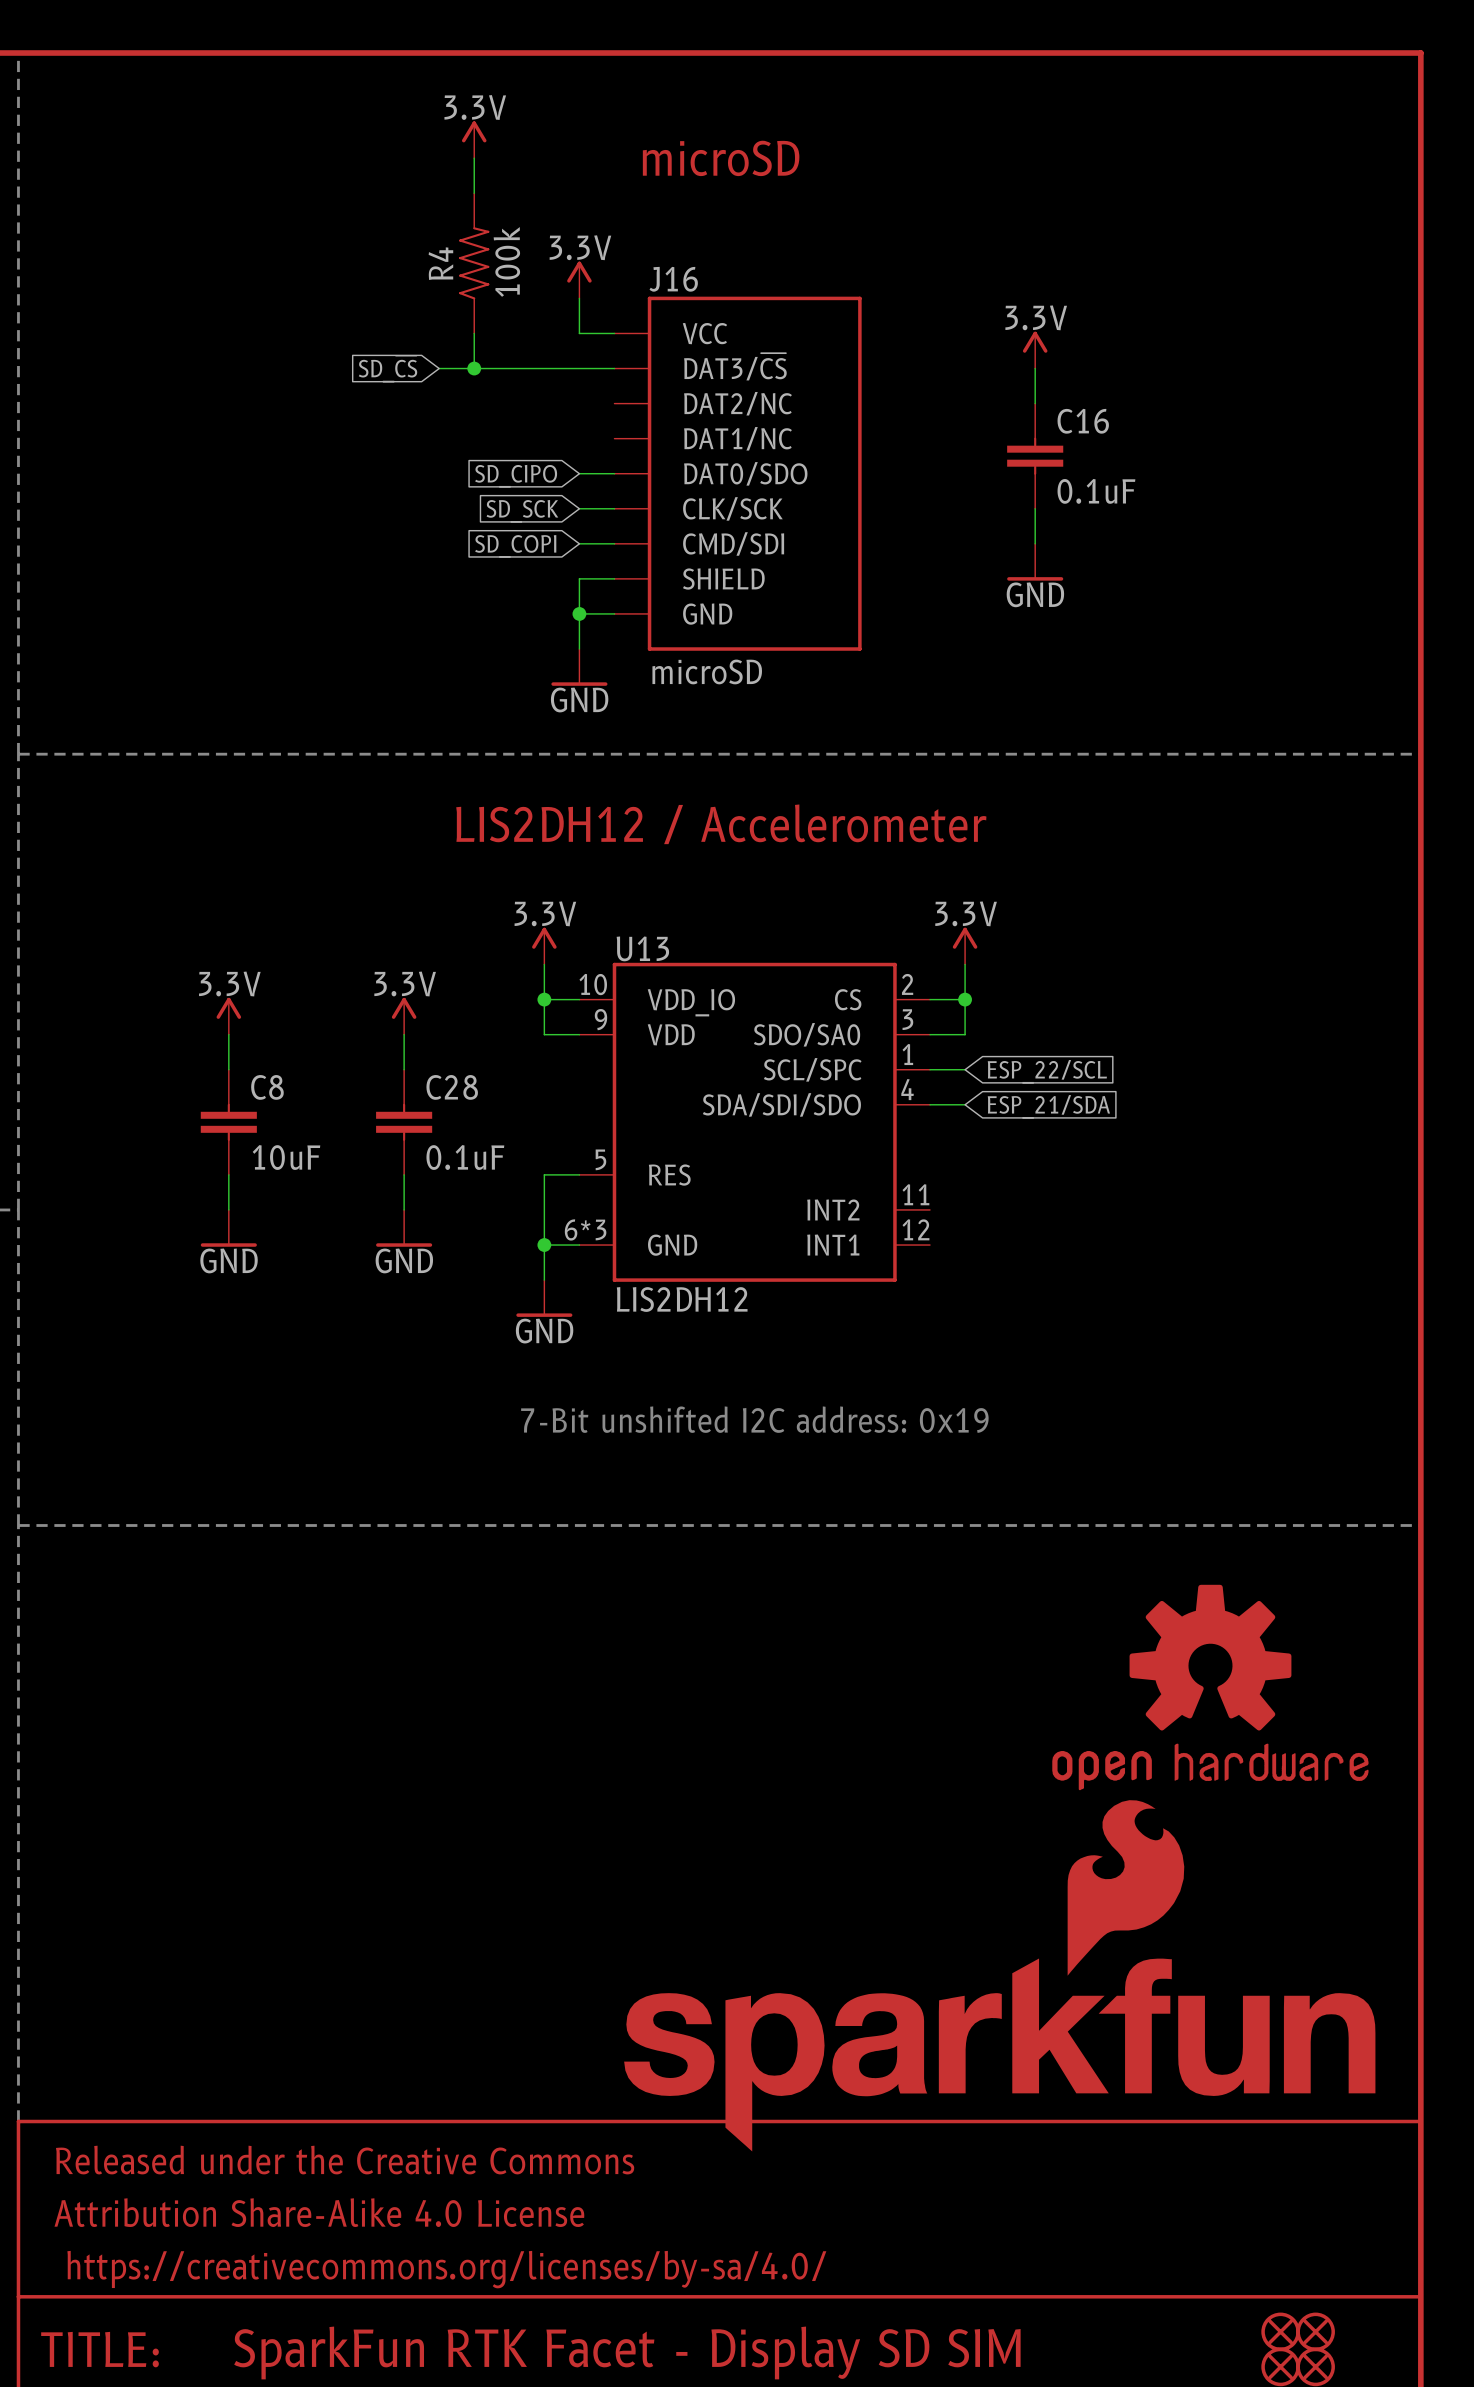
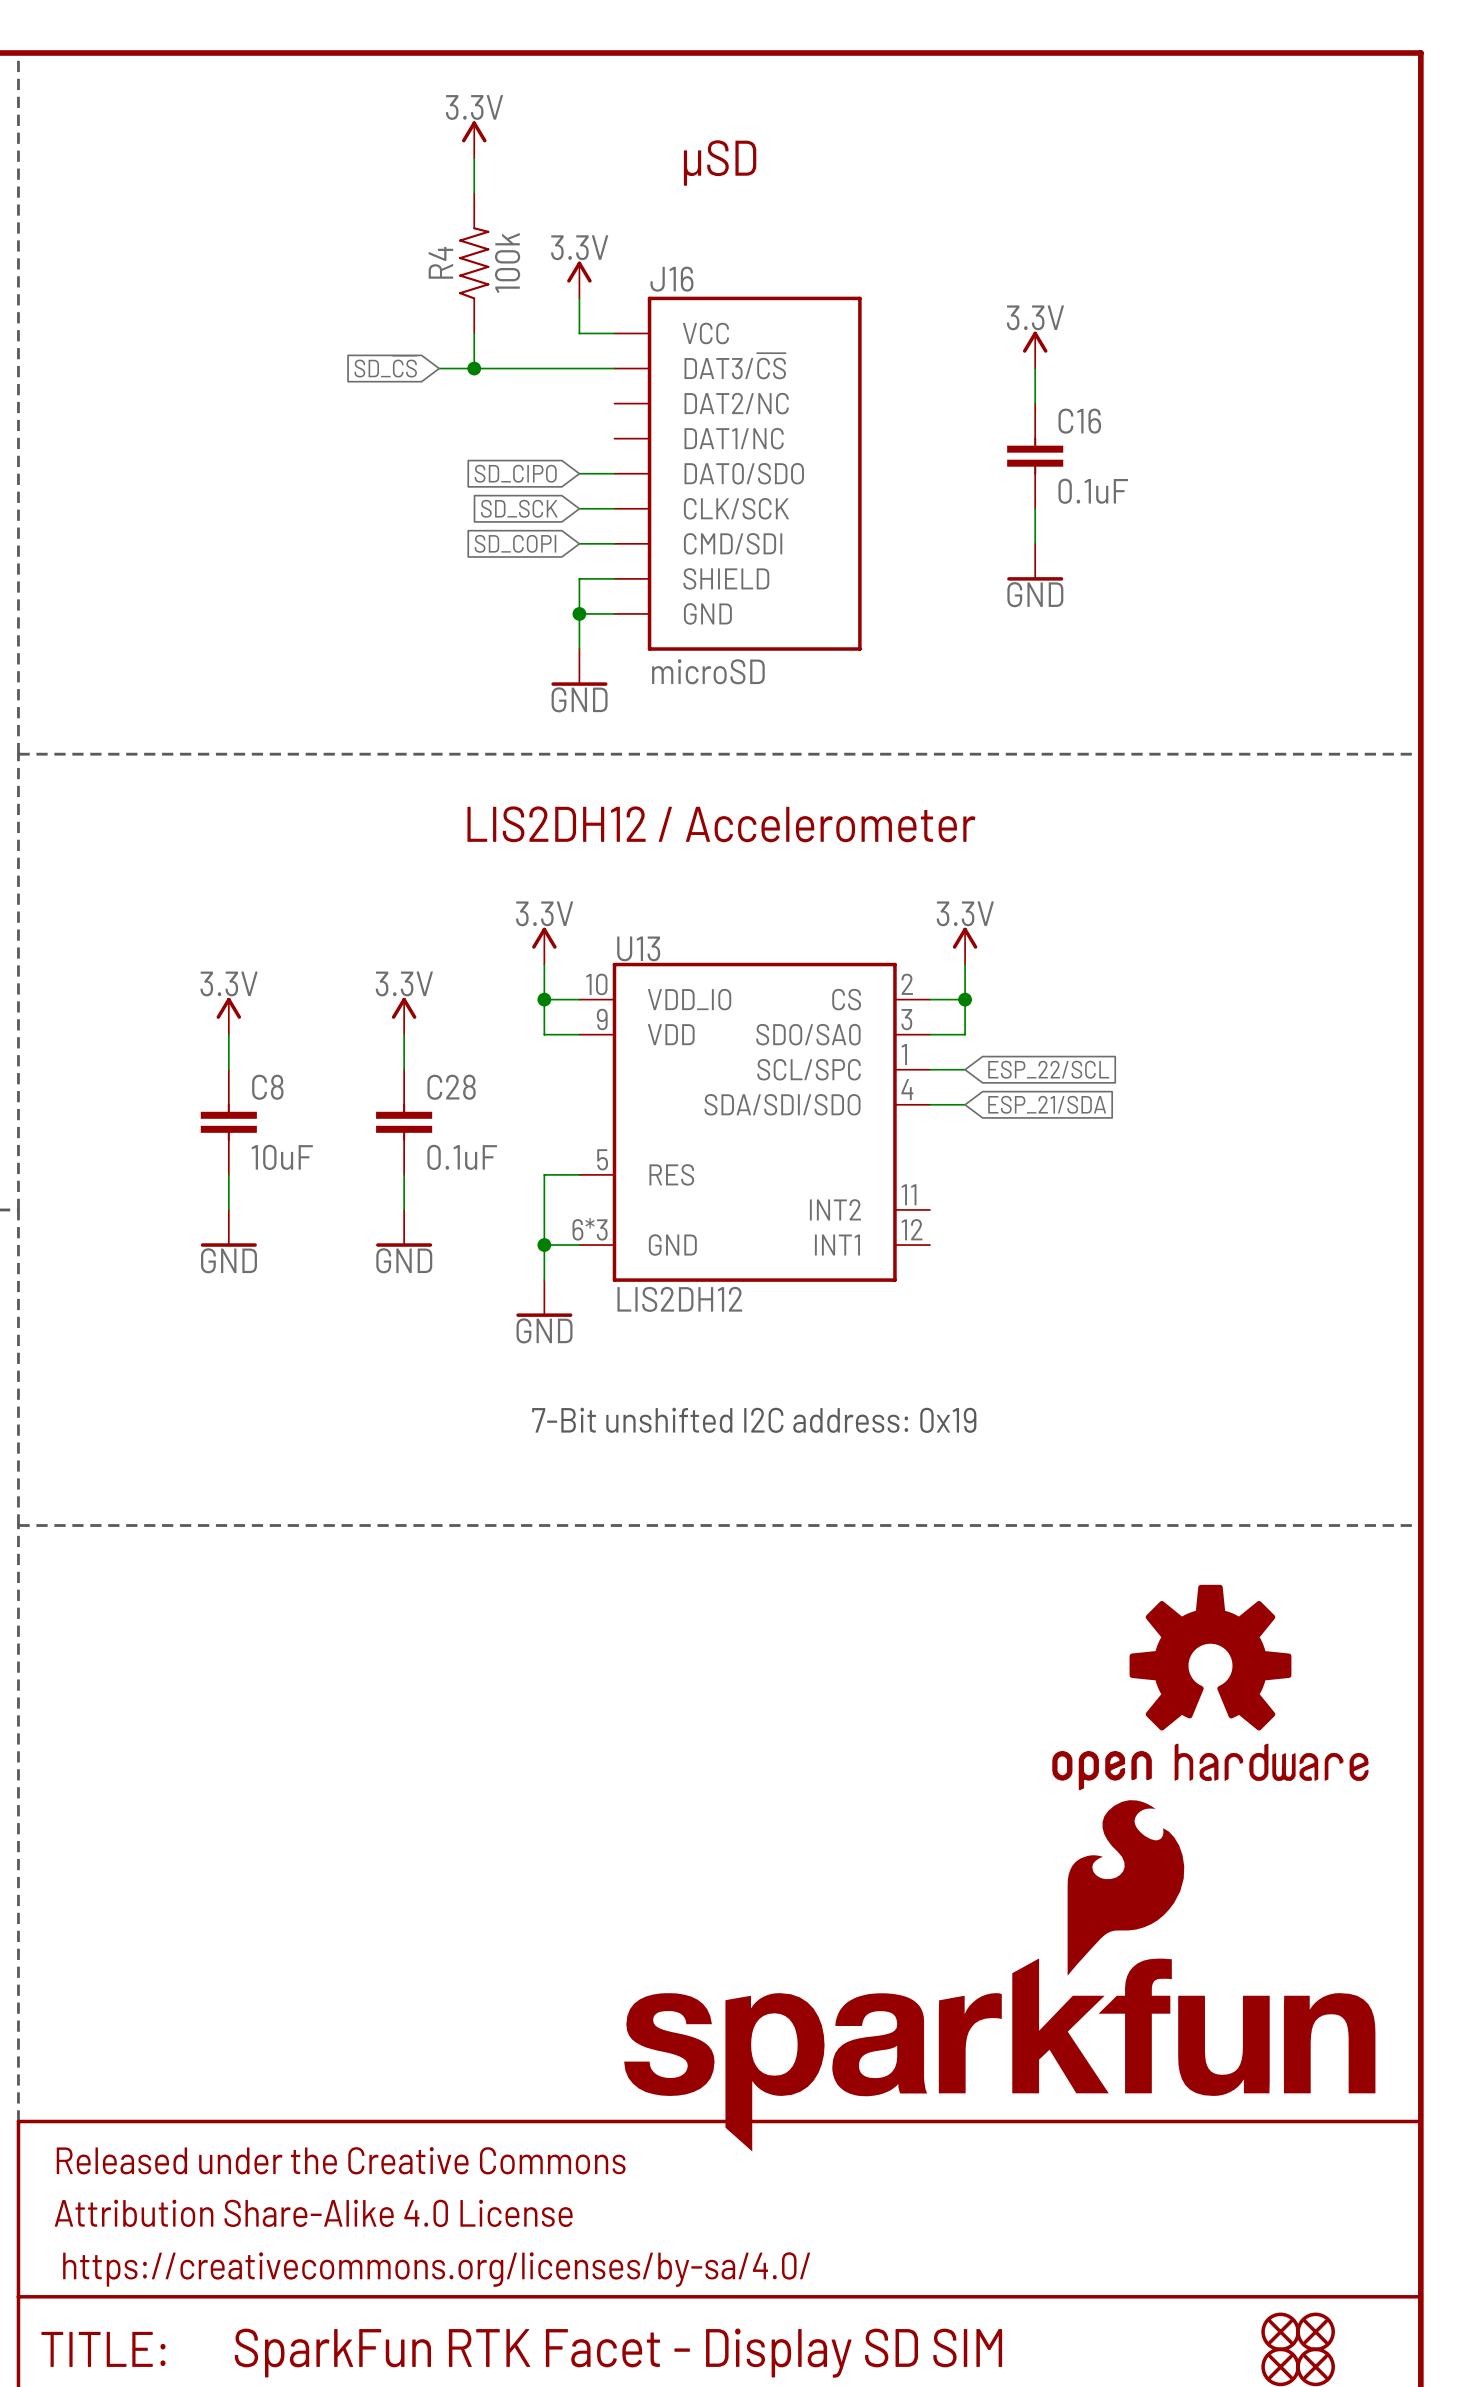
text: microSD (721, 158) -> μSD (720, 162)

